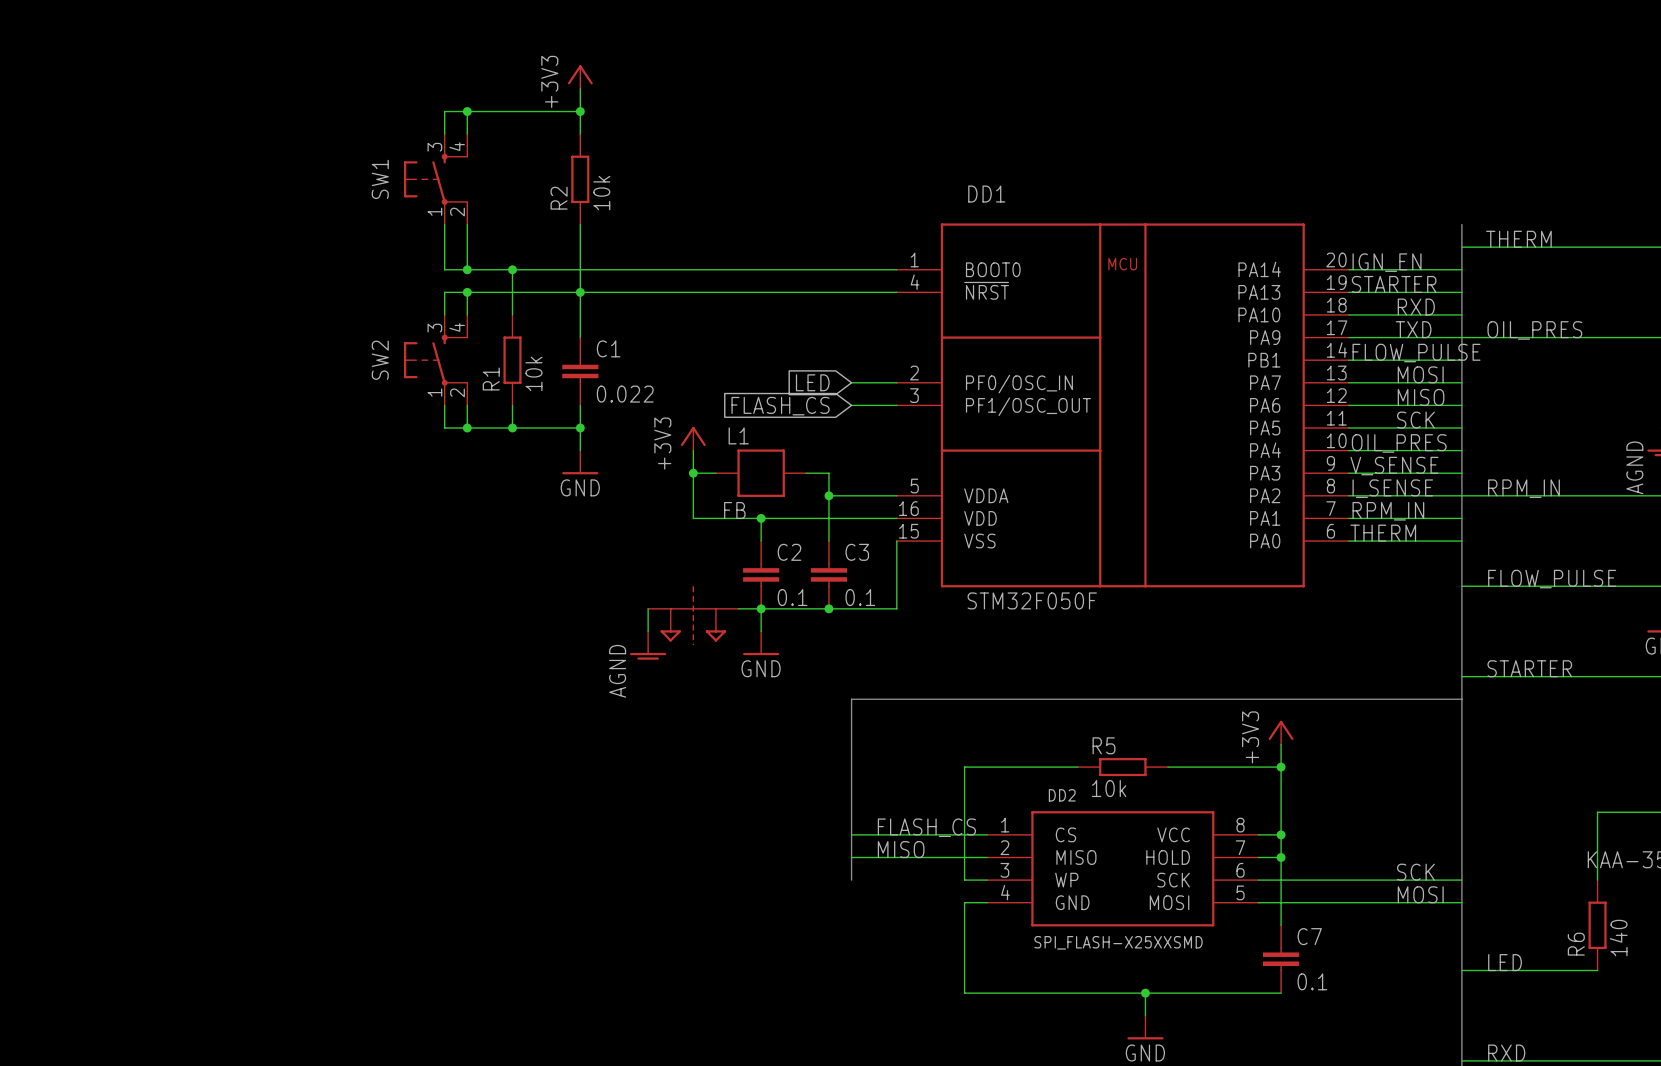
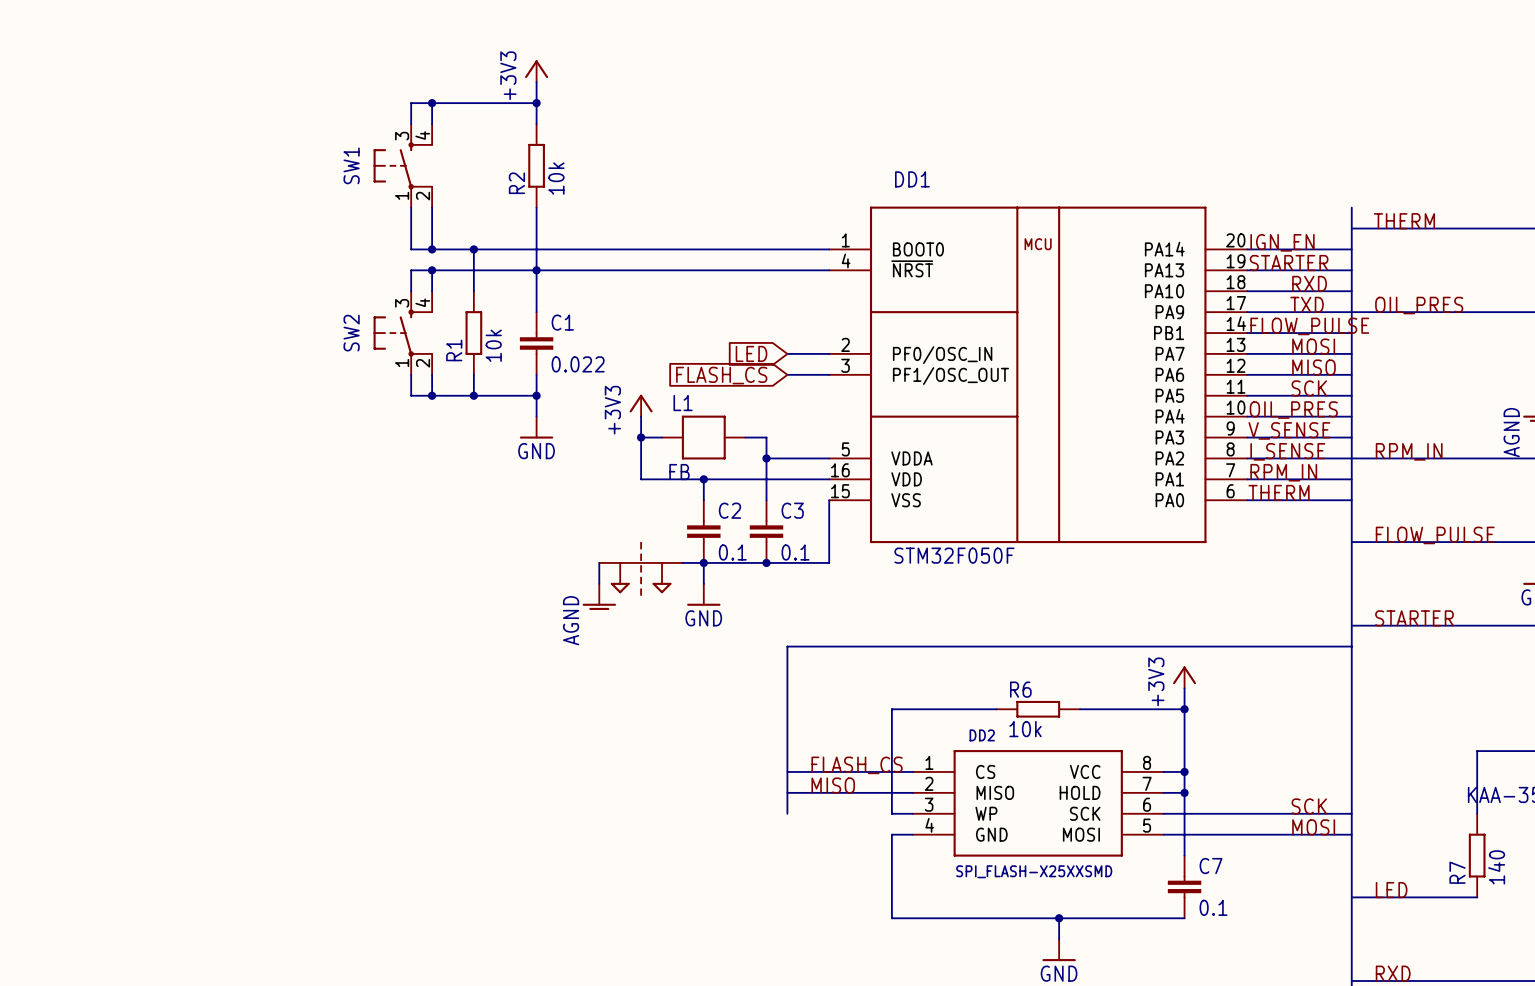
R5 name: R5 (1104, 745) -> R6 (1020, 689)
R6 name: R6 (1576, 944) -> R7 (1457, 872)

